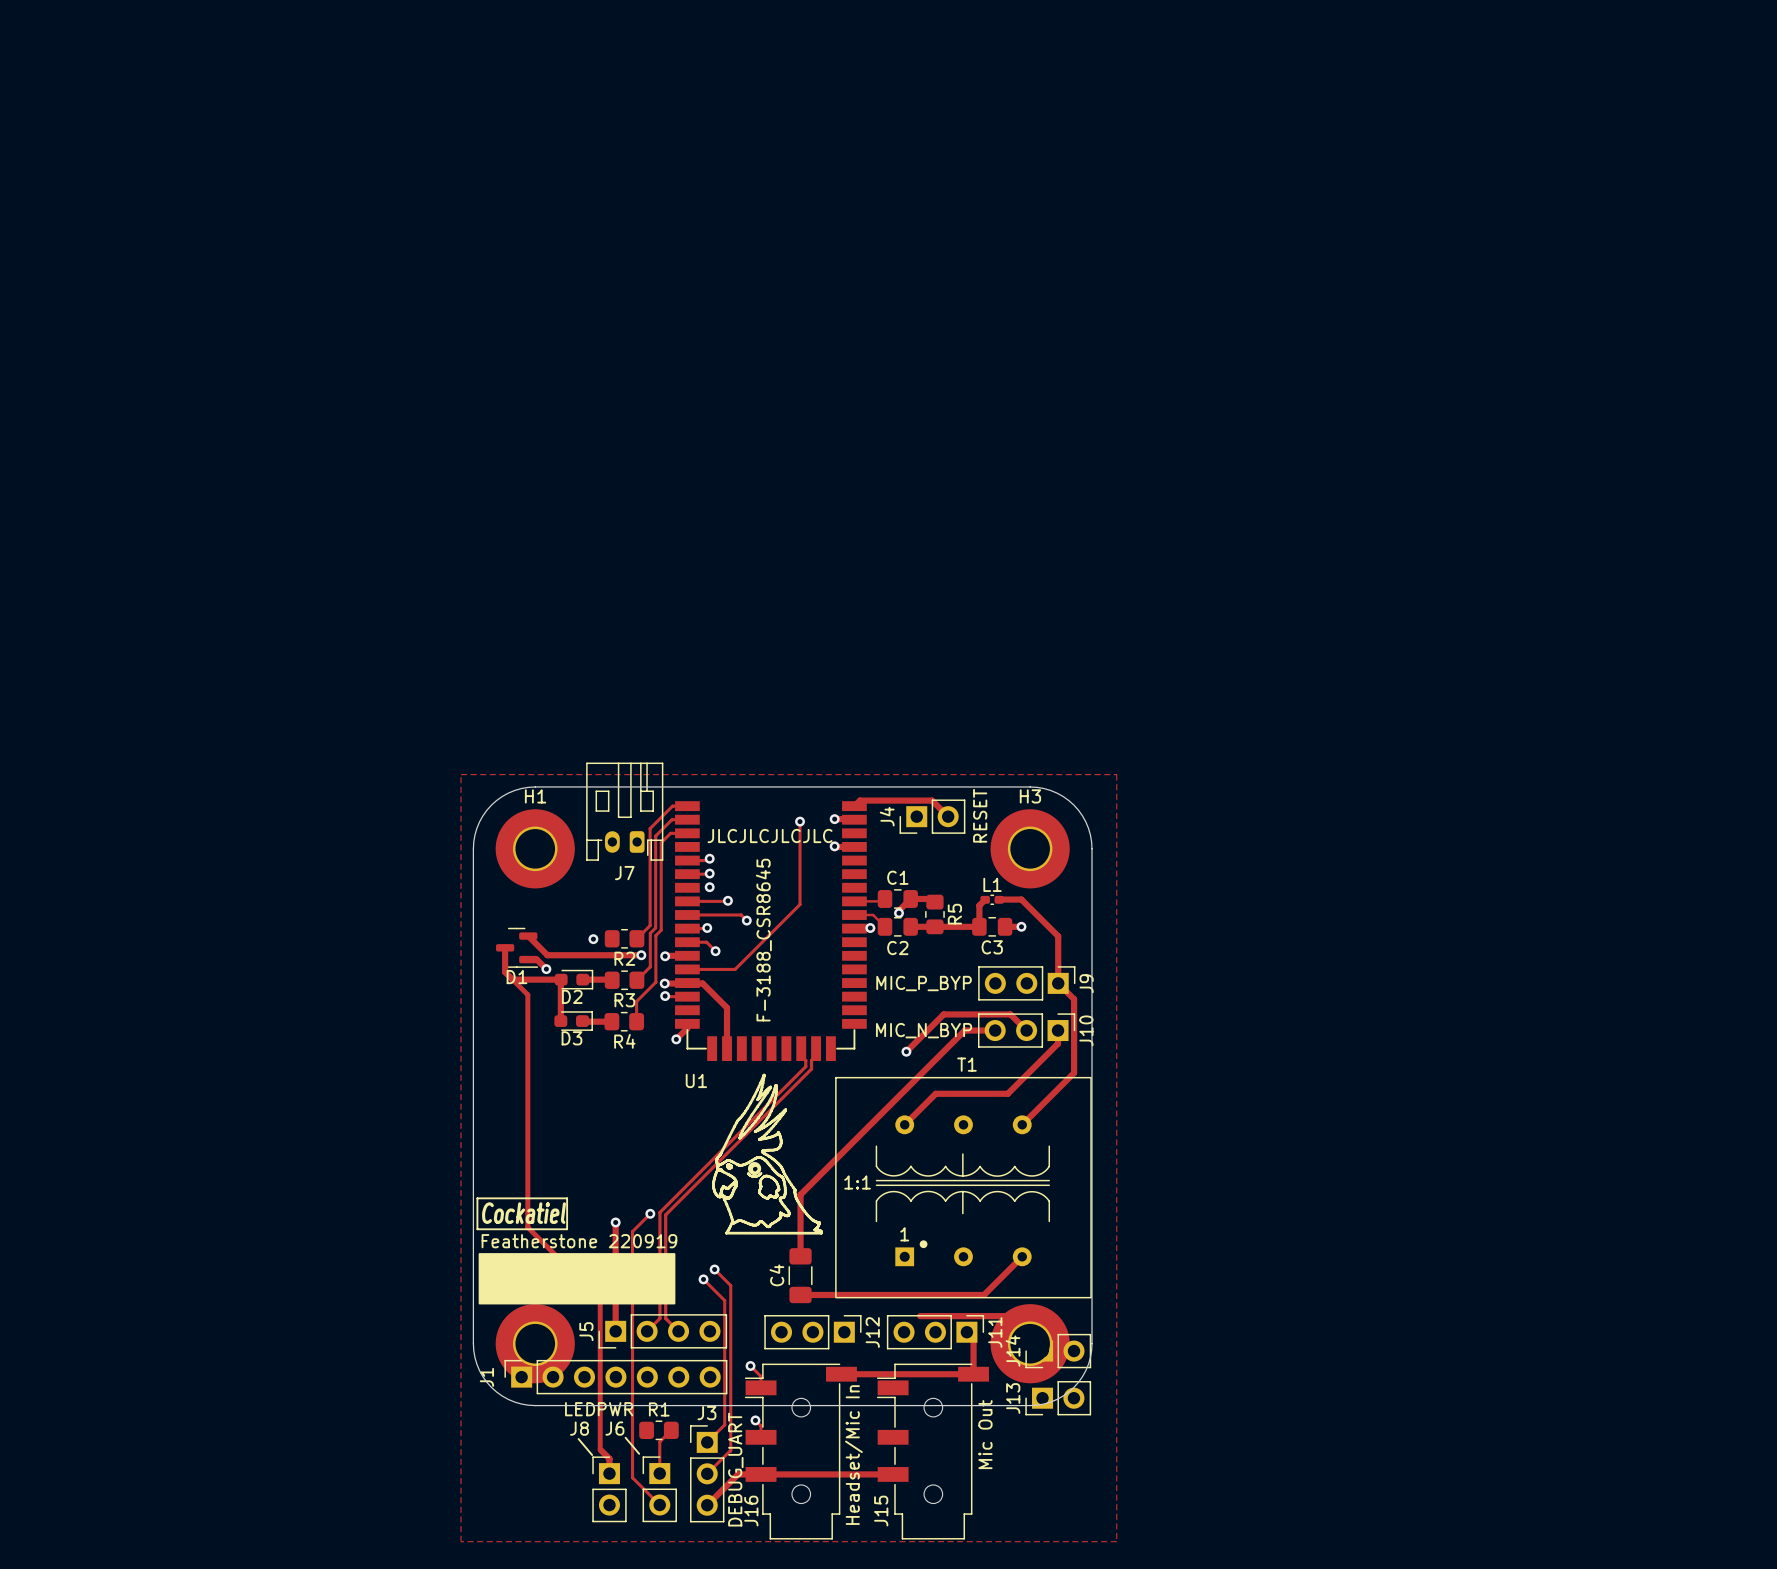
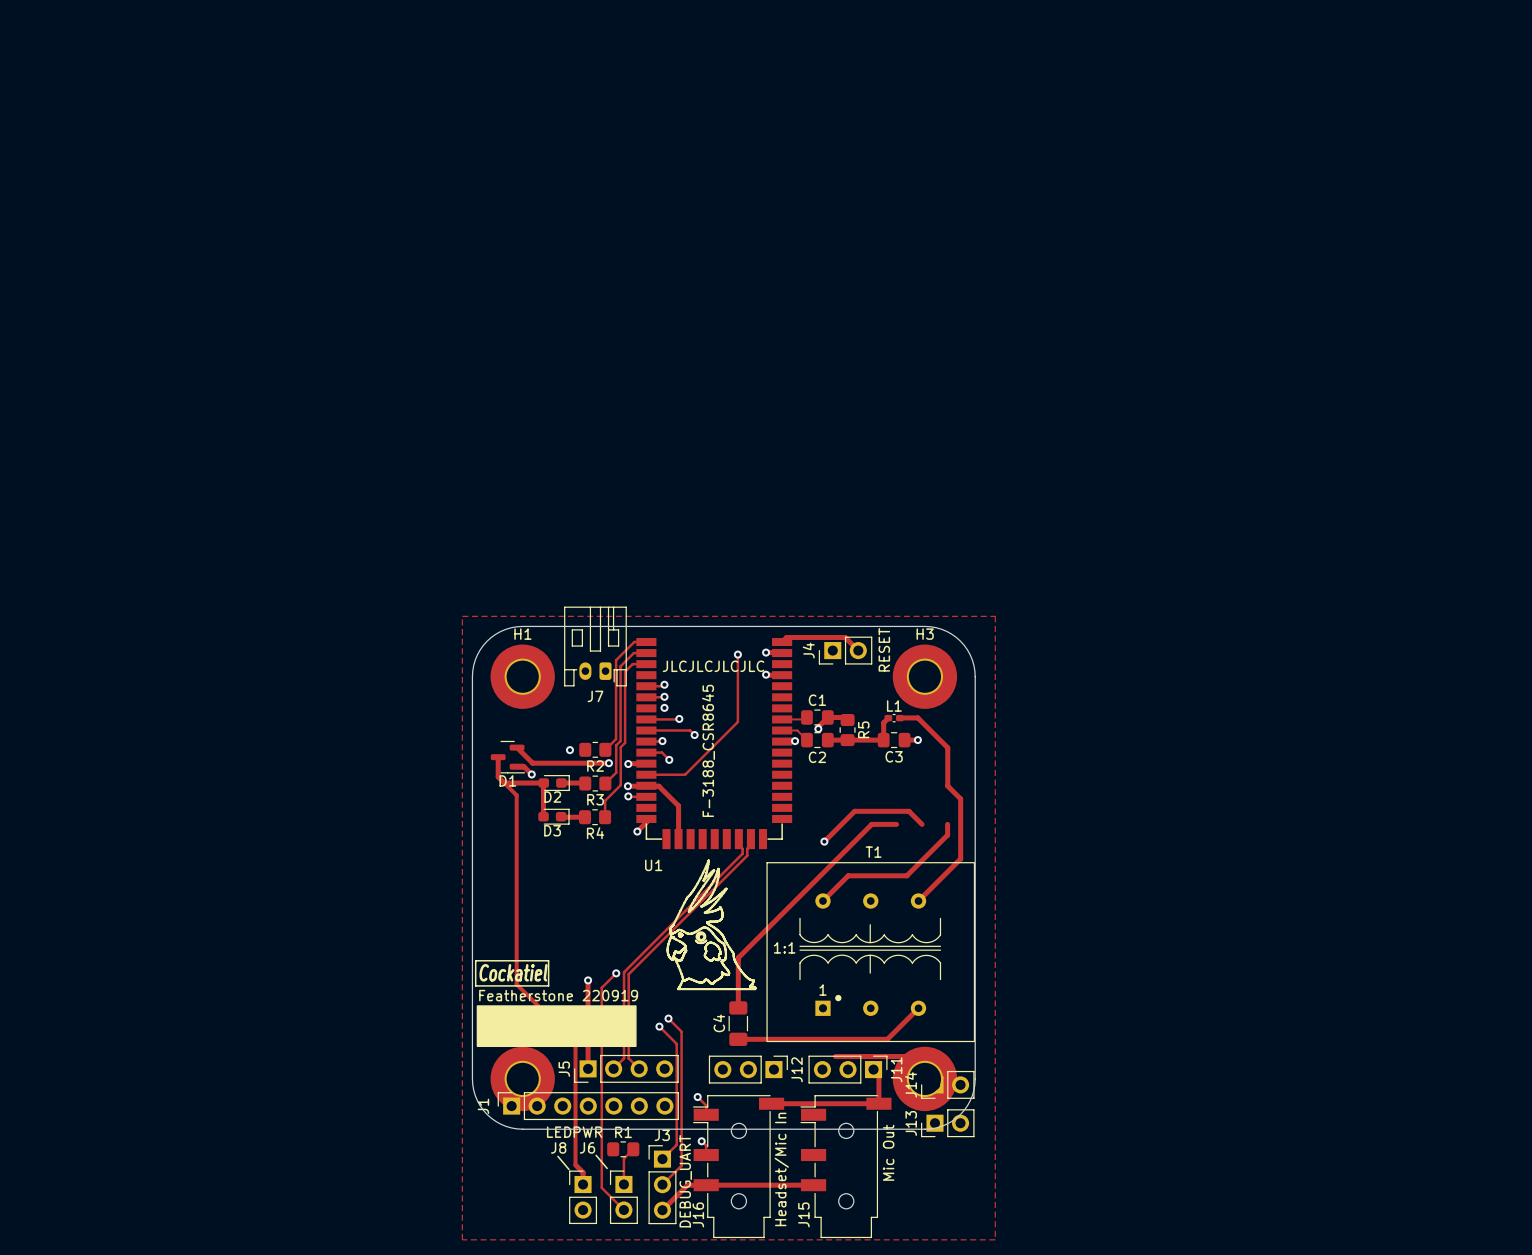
J9: MIC_P_BYP (1026, 983) -> none
J10: MIC_N_BYP (1026, 1030) -> none

